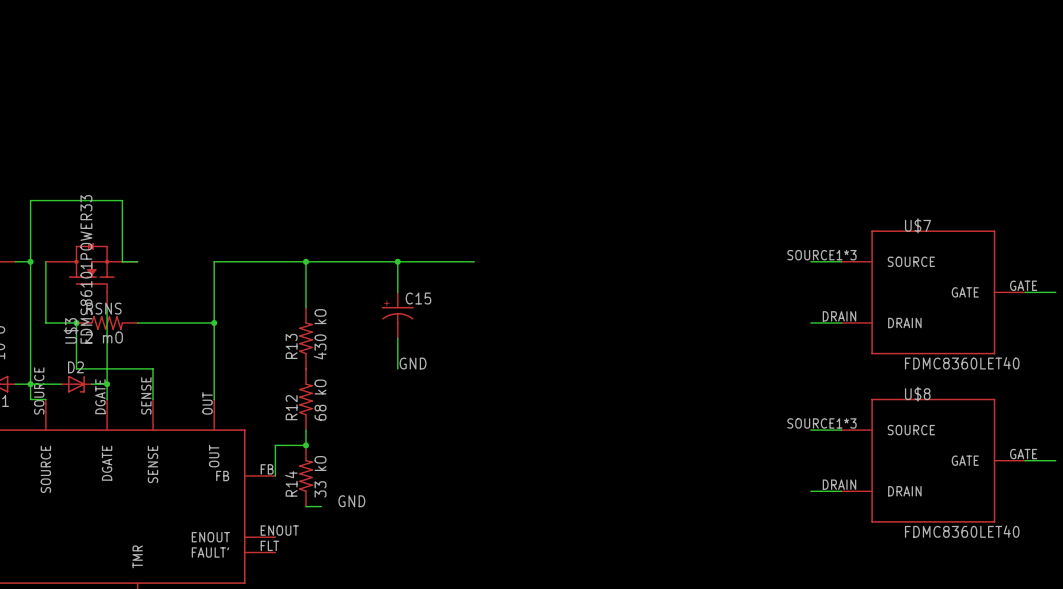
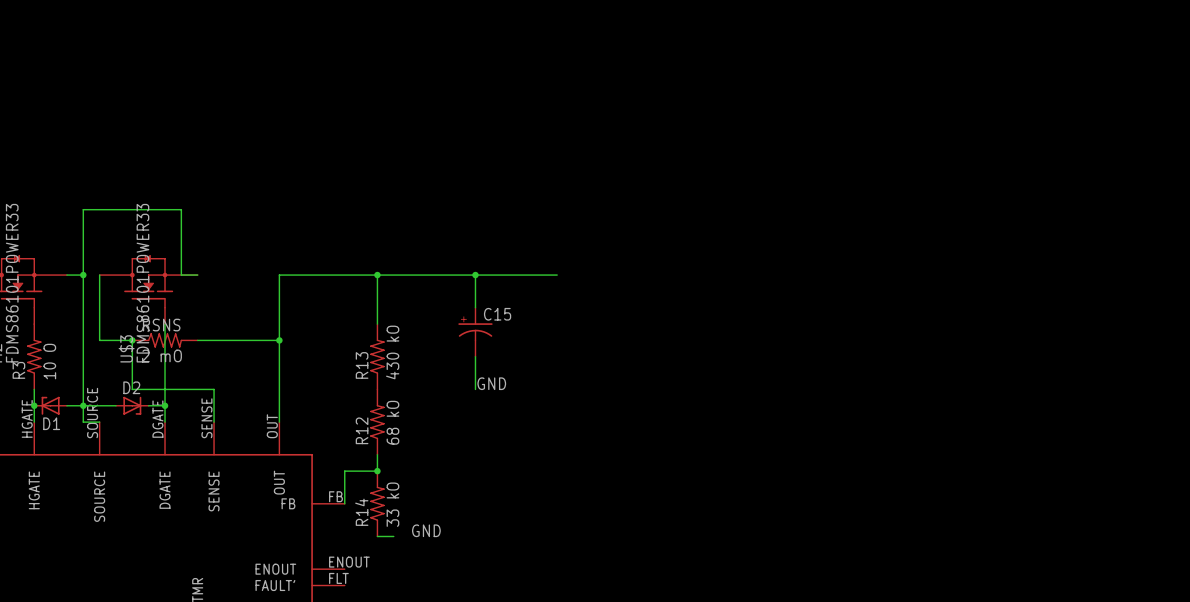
wire: (810, 261) (841, 261) -> none
U$7: FDMC8360LET40 (933, 292) -> none
wire: (1025, 292) (1055, 292) -> none
wire: (810, 322) (841, 322) -> none
wire: (810, 430) (841, 430) -> none
U$8: FDMC8360LET40 (933, 460) -> none
wire: (1025, 460) (1055, 460) -> none
wire: (810, 491) (841, 491) -> none

